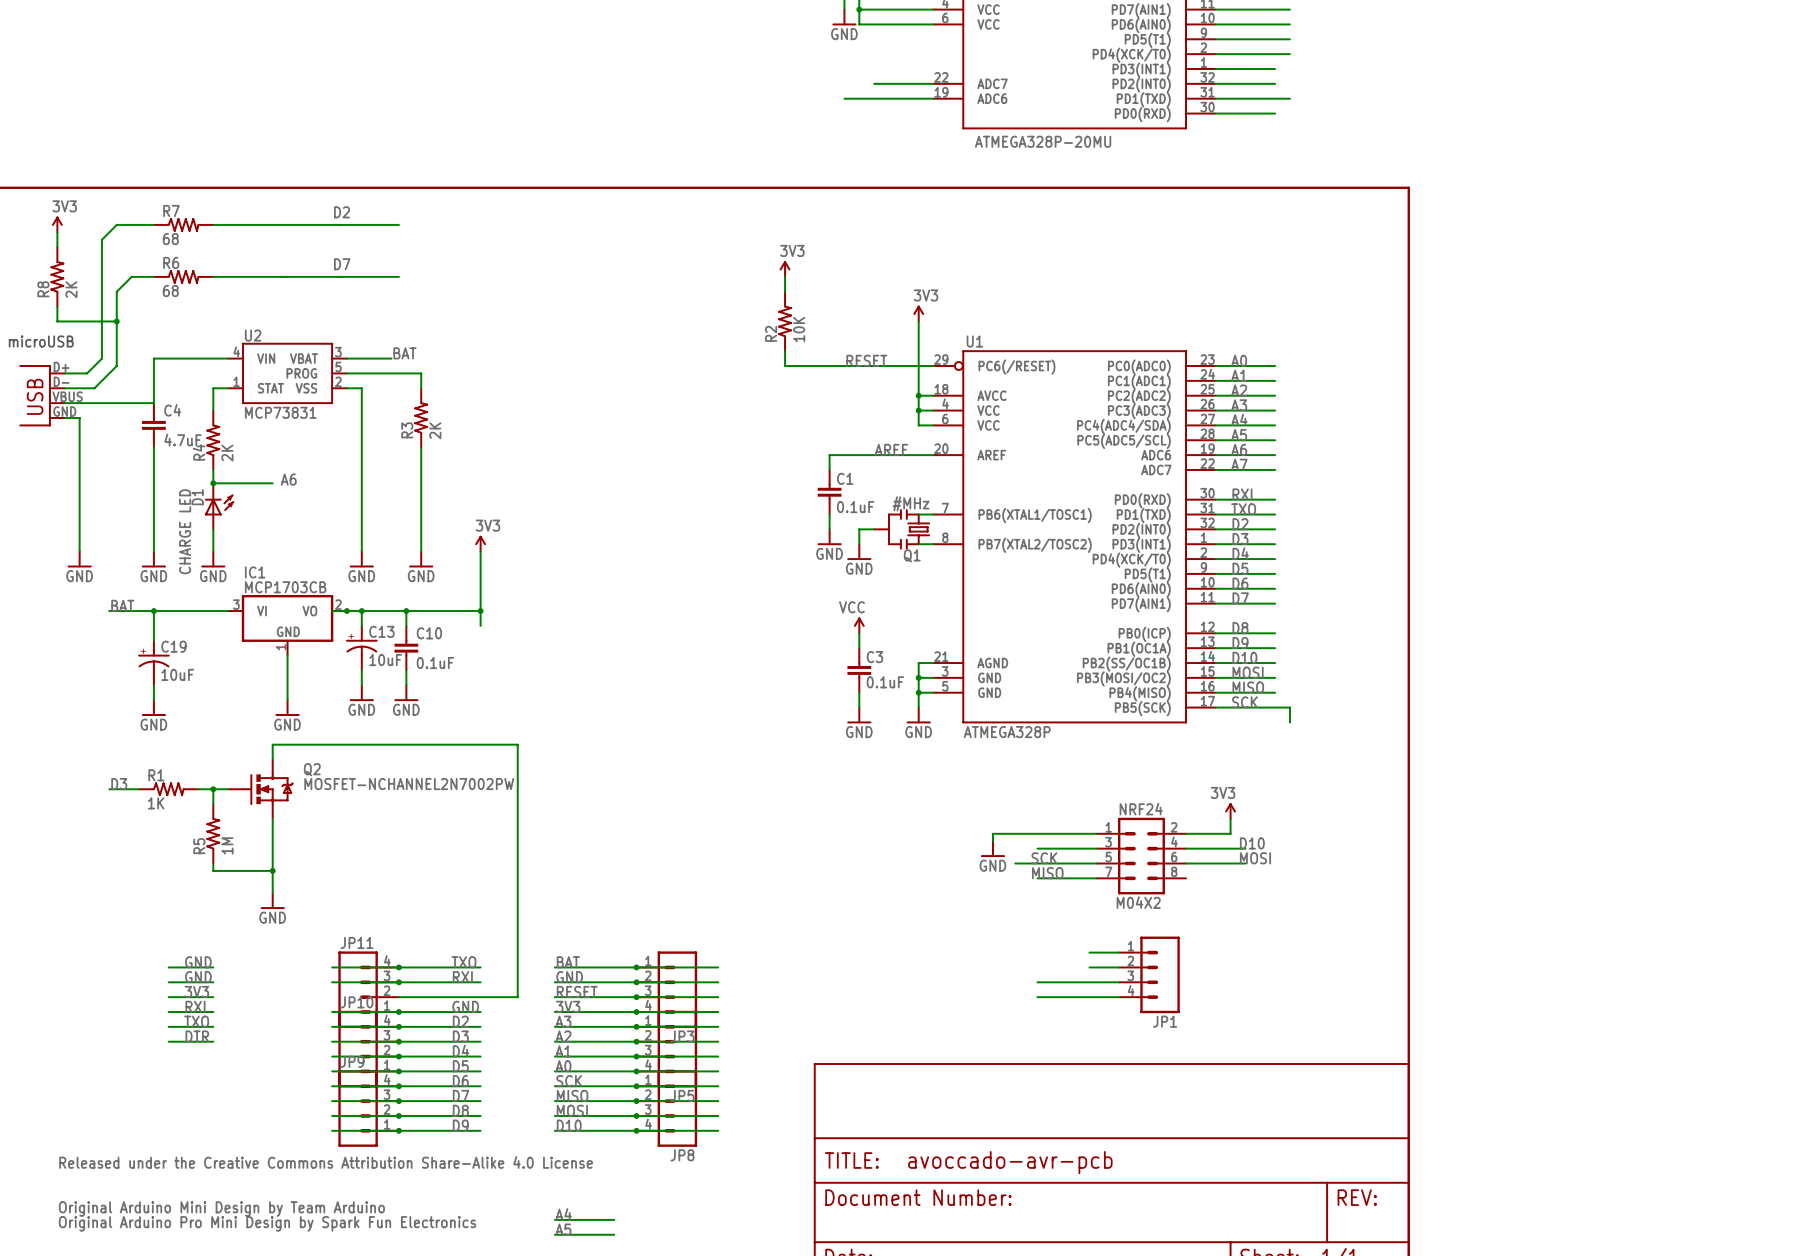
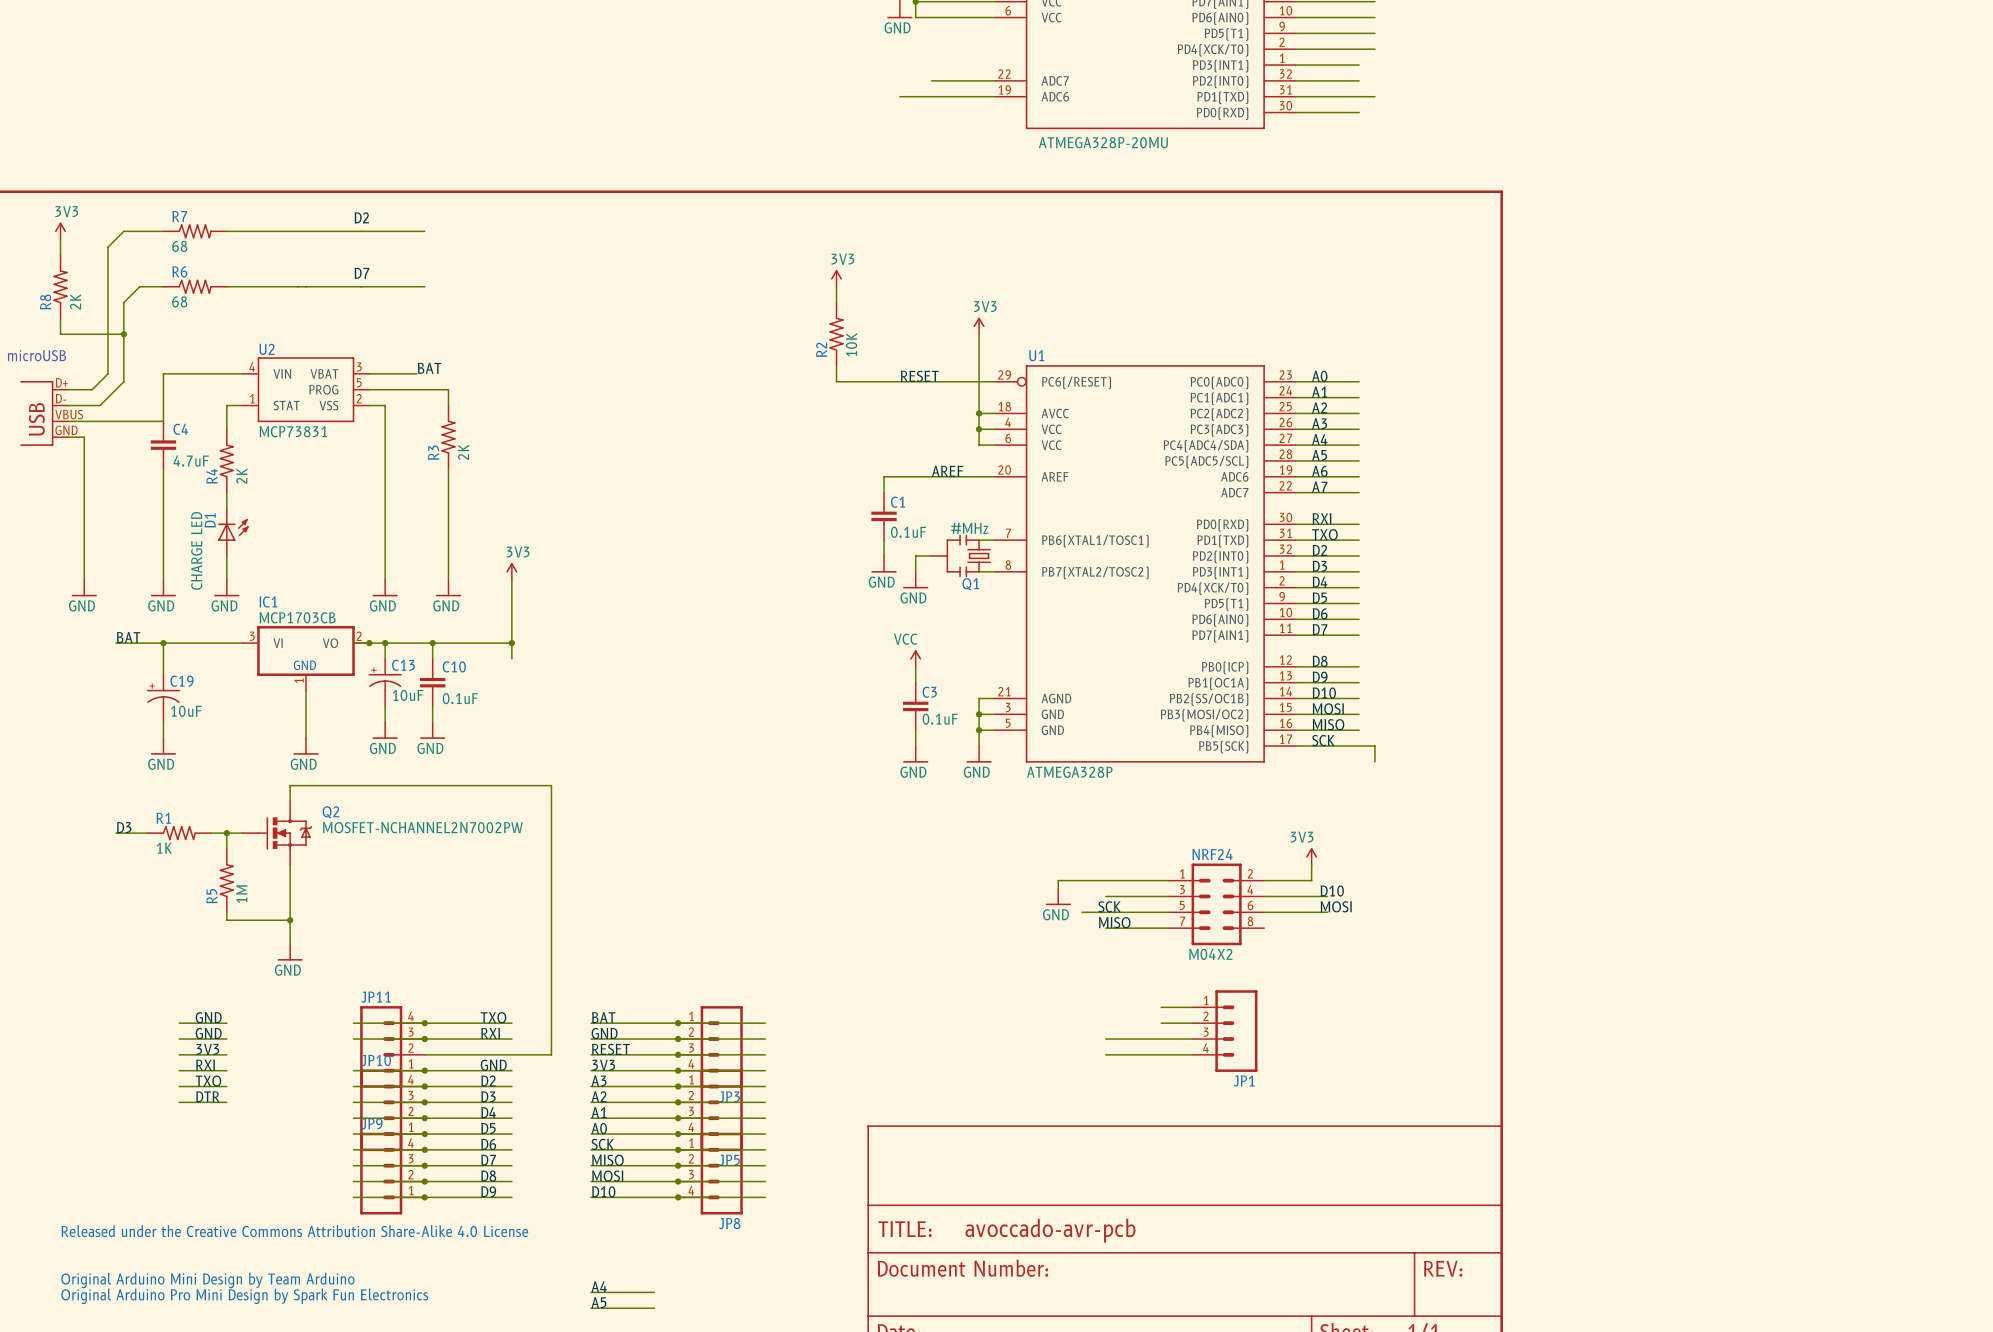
label: A6 (288, 479) -> none
wire: (213, 483) (272, 483) -> none
junction: (213, 483) -> none

